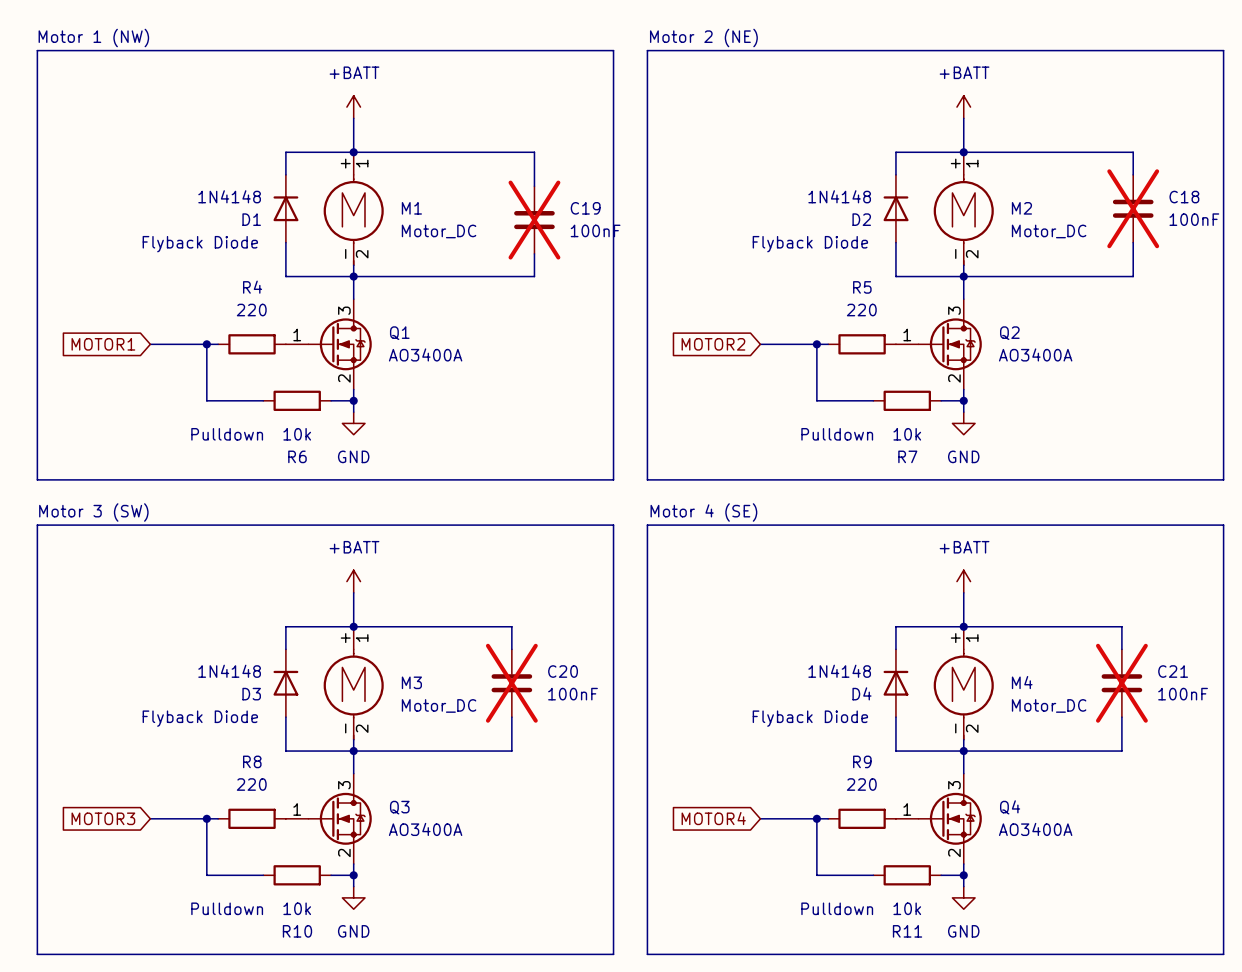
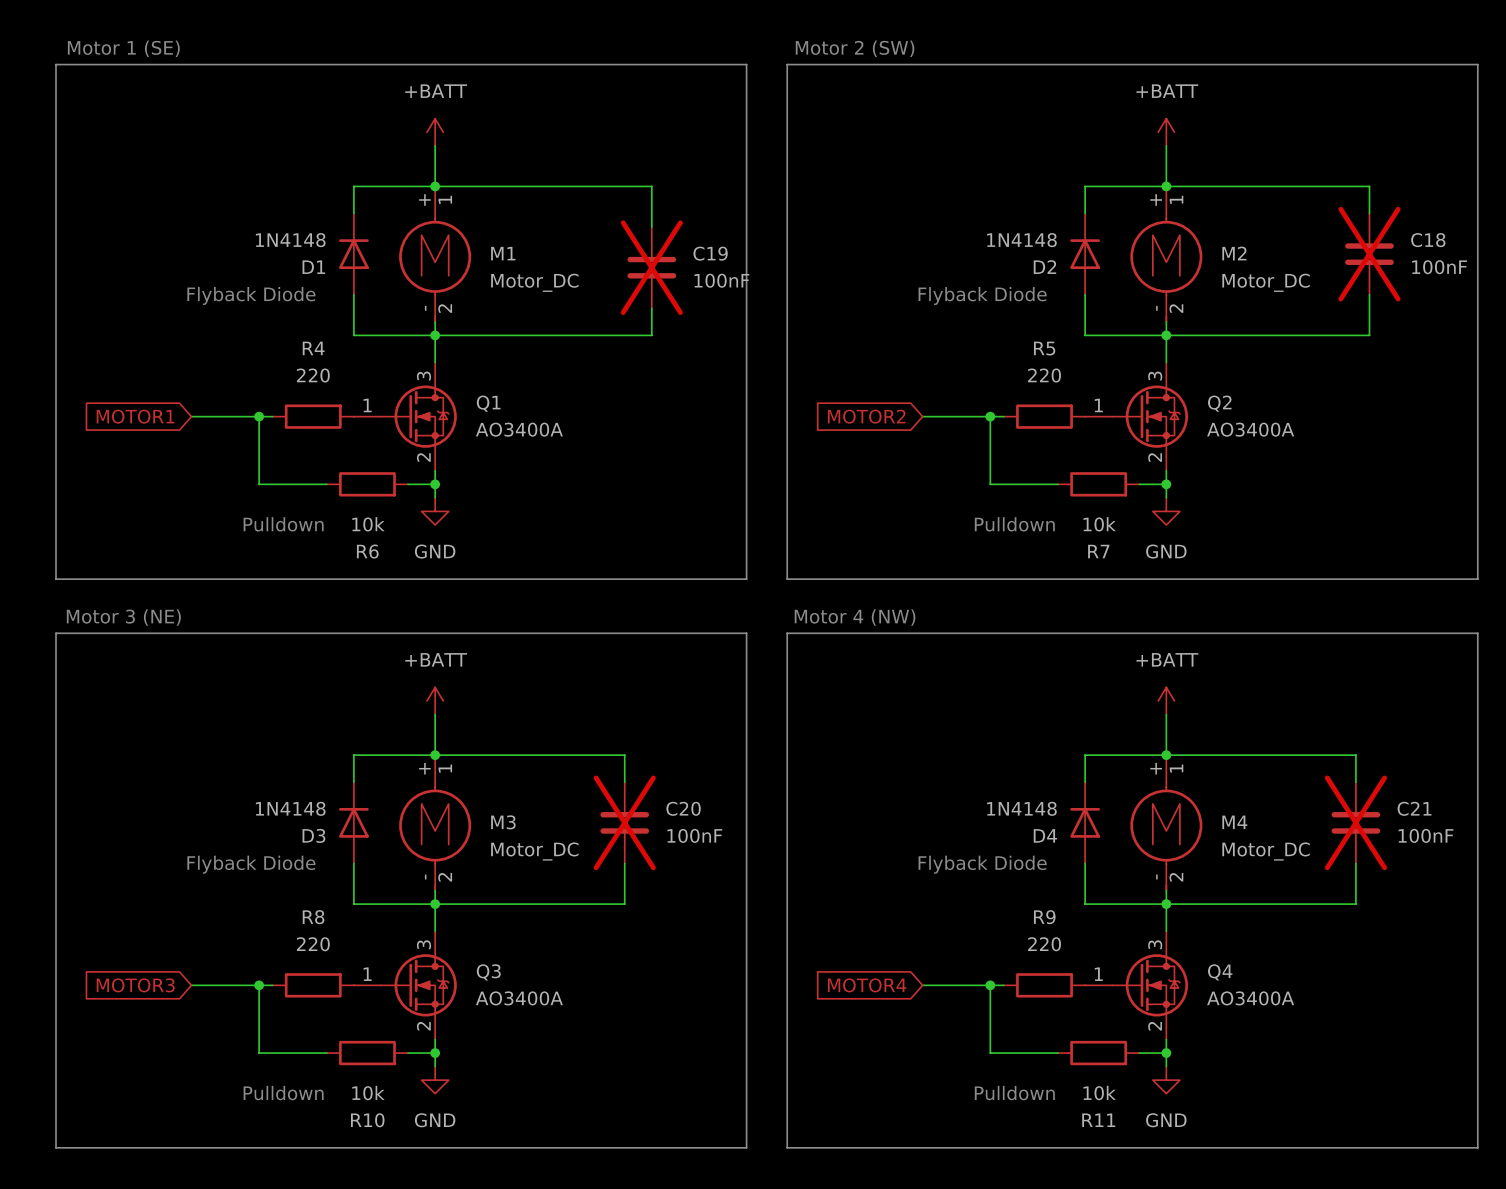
text: Motor 1 (NW) (93, 38) -> Motor 1 (SE) (123, 48)
text: Motor 2 (NE) (703, 38) -> Motor 2 (SW) (855, 48)
text: Motor 3 (SW) (93, 512) -> Motor 3 (NE) (123, 617)
text: Motor 4 (SE) (703, 512) -> Motor 4 (NW) (855, 617)

